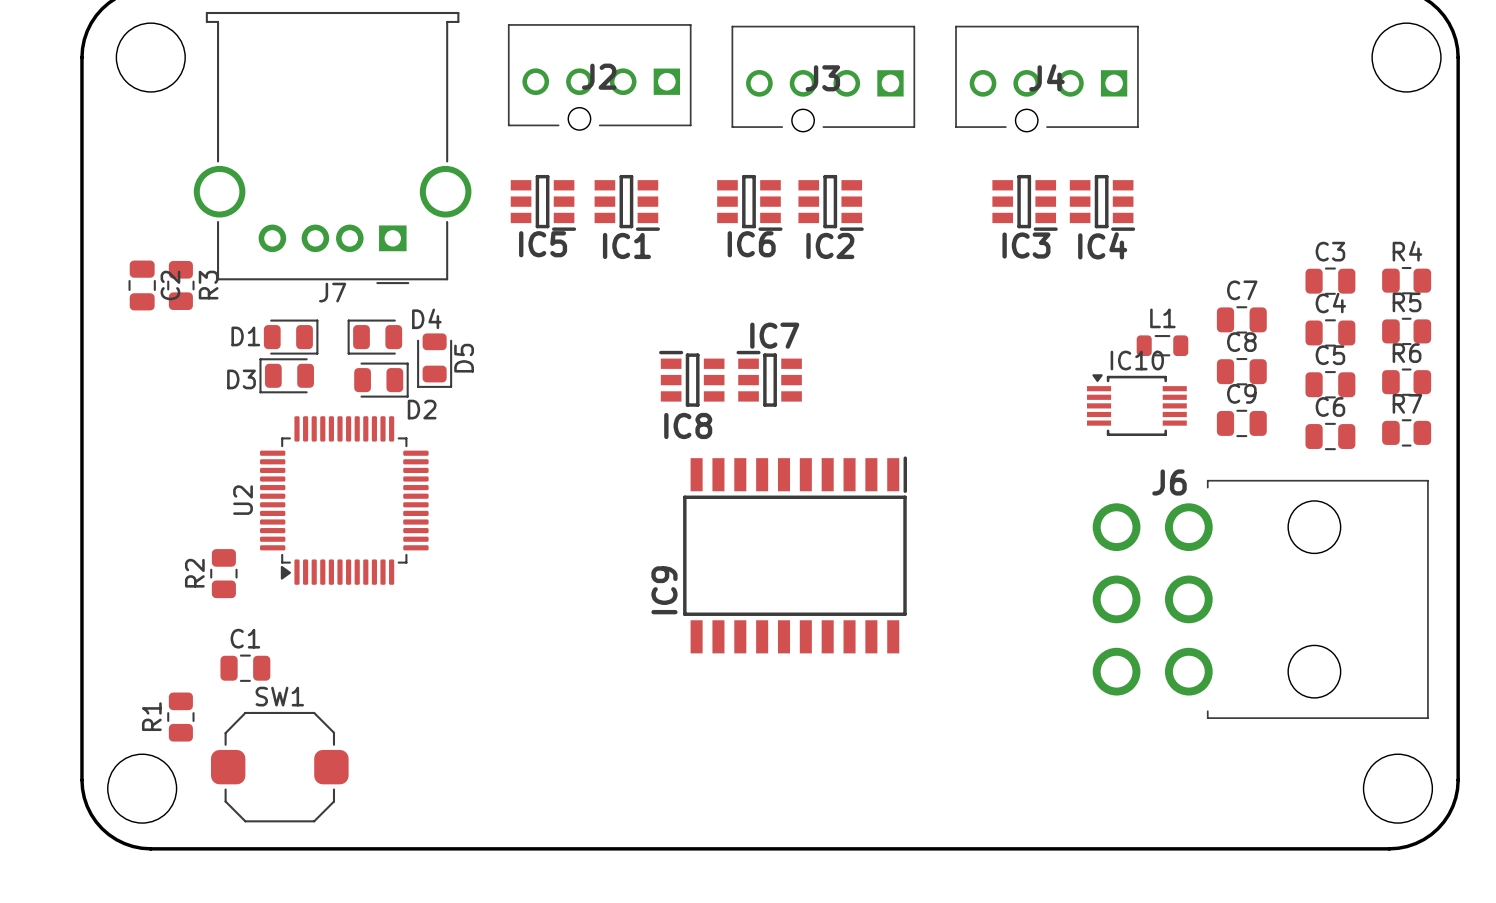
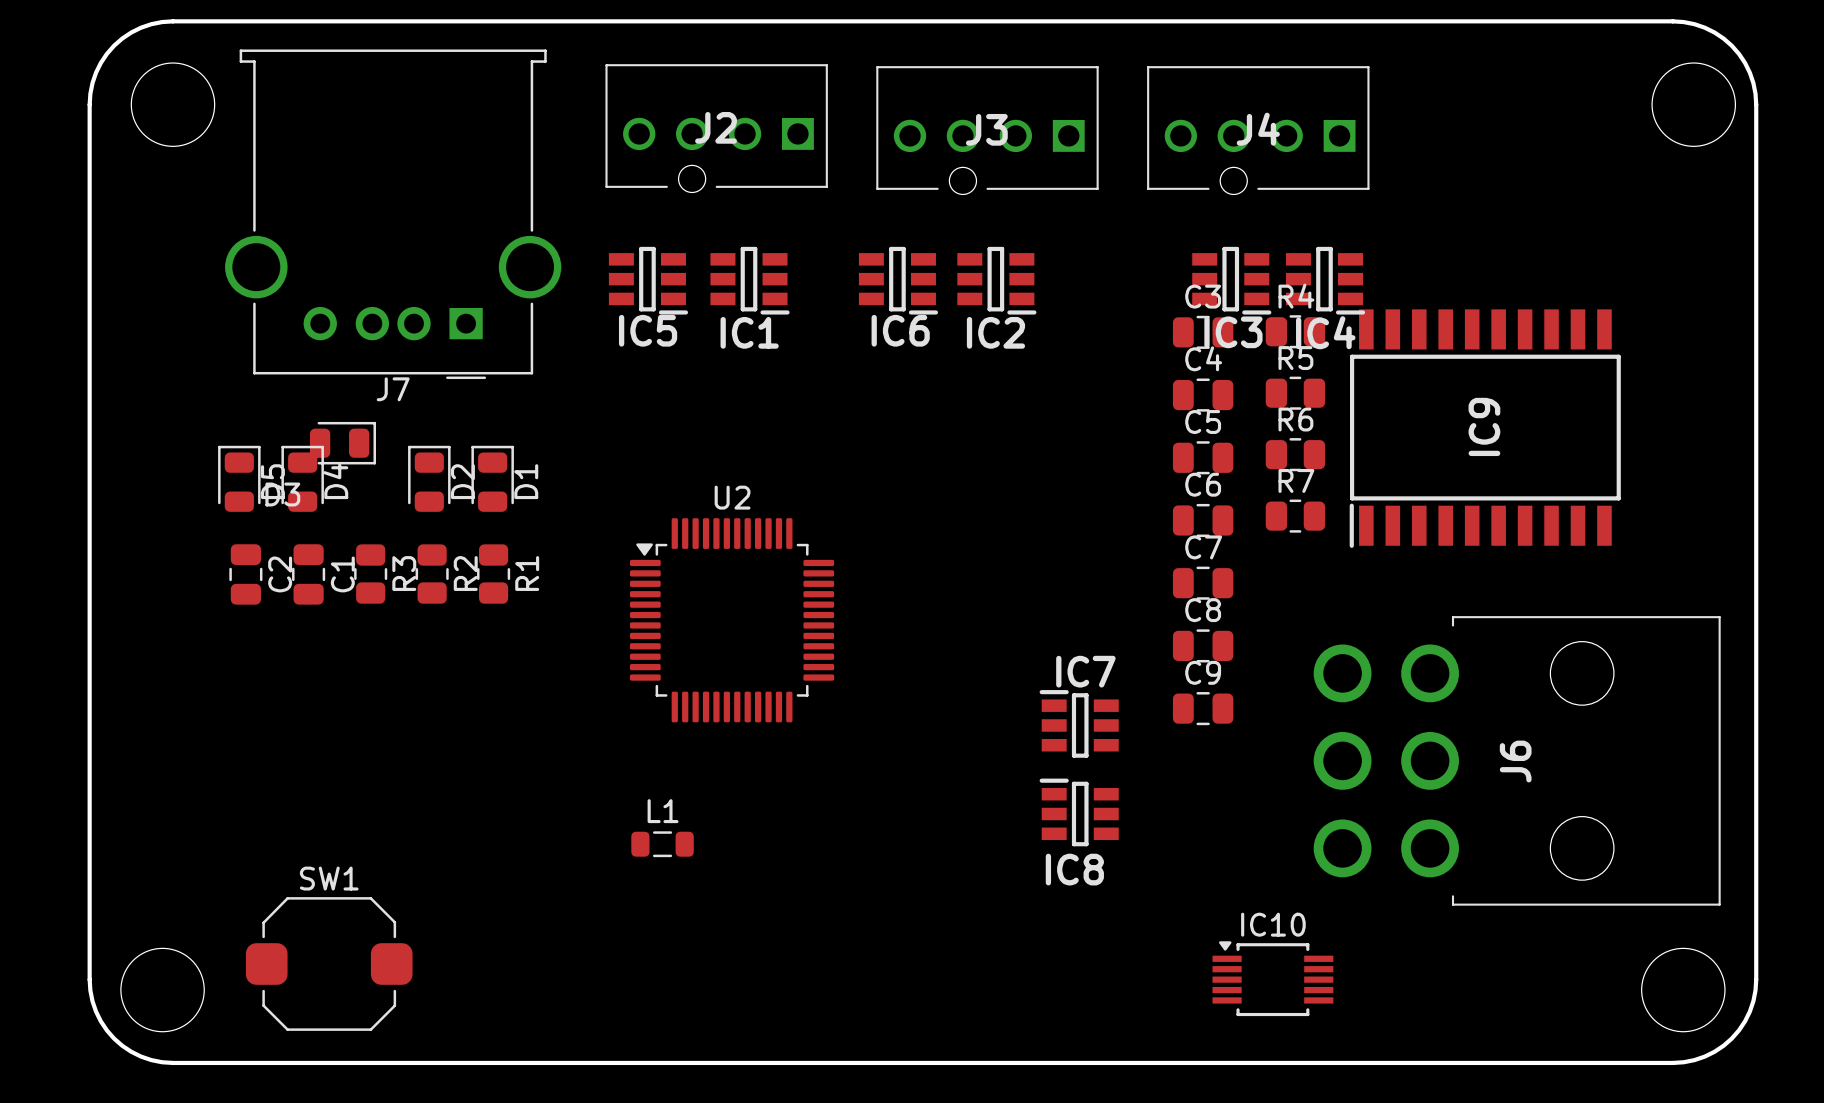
R4 position: (1406, 280) -> (1295, 331)
C3 position: (1330, 281) -> (1203, 332)
C2 position: (142, 285) -> (245, 574)
R3 position: (180, 285) -> (370, 574)
C7 position: (1241, 319) -> (1203, 583)
R5 position: (1406, 331) -> (1295, 393)
C4 position: (1330, 332) -> (1203, 395)
D1 name position: D1 (245, 336) -> D1 (526, 481)
D4 rotation: 0° (374, 337) -> 90° clockwise (302, 478)
D4 position: (374, 337) -> (302, 478)
L1 position: (1162, 345) -> (662, 844)
D5 rotation: 0° (434, 360) -> 180° (239, 478)
D5 position: (434, 360) -> (239, 478)
C8 position: (1241, 371) -> (1203, 645)
D1 rotation: 0° (286, 375) -> 90° clockwise (492, 478)
D1 position: (286, 375) -> (492, 478)
IC8 position: (691, 378) -> (1079, 812)
IC7 position: (769, 378) -> (1079, 723)
D2 rotation: 0° (381, 380) -> 90° counterclockwise (429, 478)
R6 position: (1406, 382) -> (1295, 454)
C5 position: (1330, 384) -> (1203, 457)
IC10 position: (1136, 405) -> (1272, 978)
C9 position: (1241, 423) -> (1203, 708)
R7 position: (1406, 432) -> (1295, 516)
C6 position: (1330, 436) -> (1203, 520)
J6 name rotation: 0° (1169, 482) -> 90° counterclockwise (1515, 761)
J6 name position: J6 (1169, 482) -> J6 (1515, 761)
U2 rotation: 0° (344, 500) -> 90° clockwise (732, 620)
U2 position: (344, 500) -> (732, 620)
IC9 rotation: 0° (795, 554) -> 180° (1485, 428)
IC9 position: (795, 554) -> (1485, 428)
R2 name position: R2 (194, 573) -> R2 (465, 573)
R2 position: (223, 573) -> (432, 574)
IC9 name position: IC9 (664, 590) -> IC9 (1484, 426)
C1 rotation: 0° (245, 668) -> 90° clockwise (308, 574)
C1 position: (245, 668) -> (308, 574)
R1 name position: R1 (151, 716) -> R1 (527, 573)
R1 position: (180, 717) -> (493, 574)

